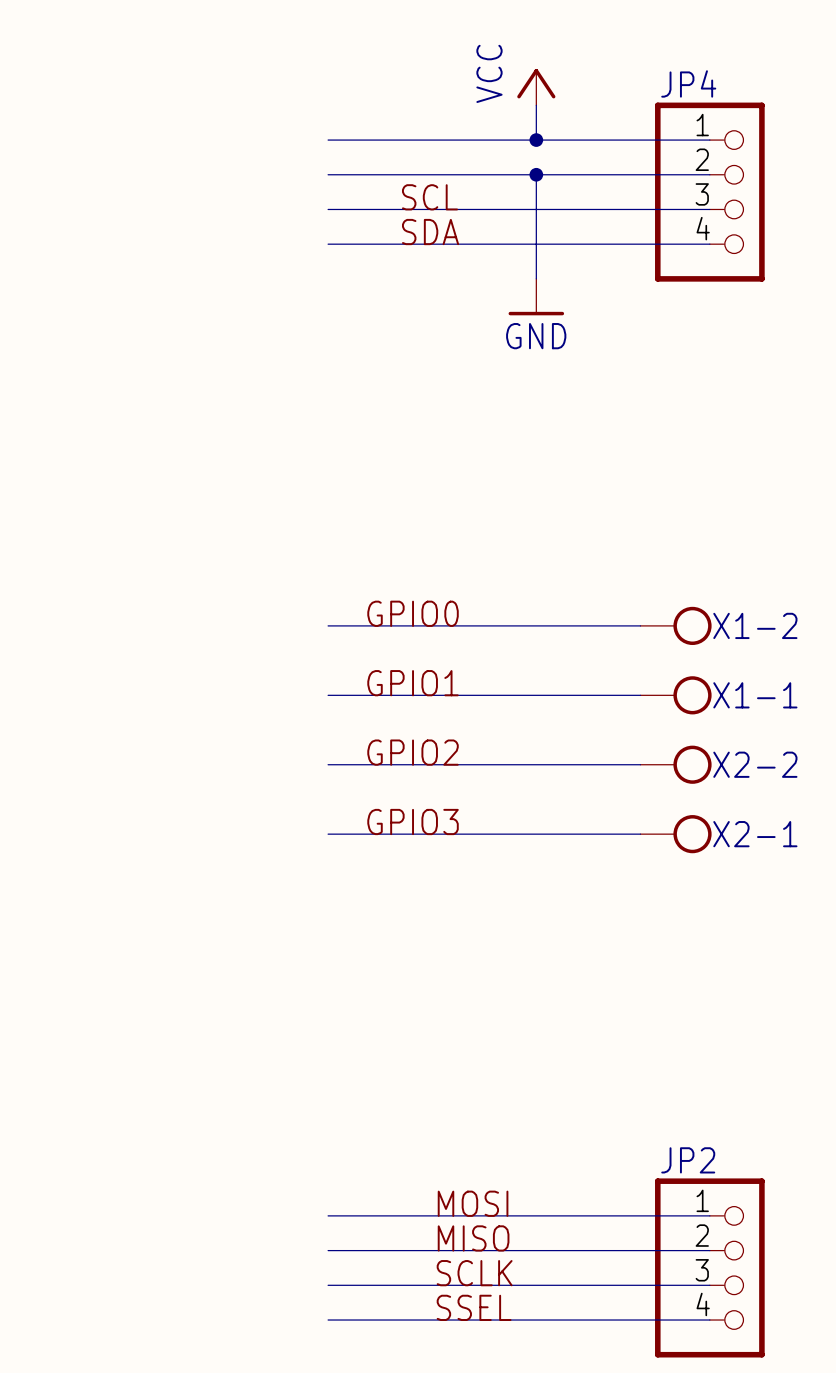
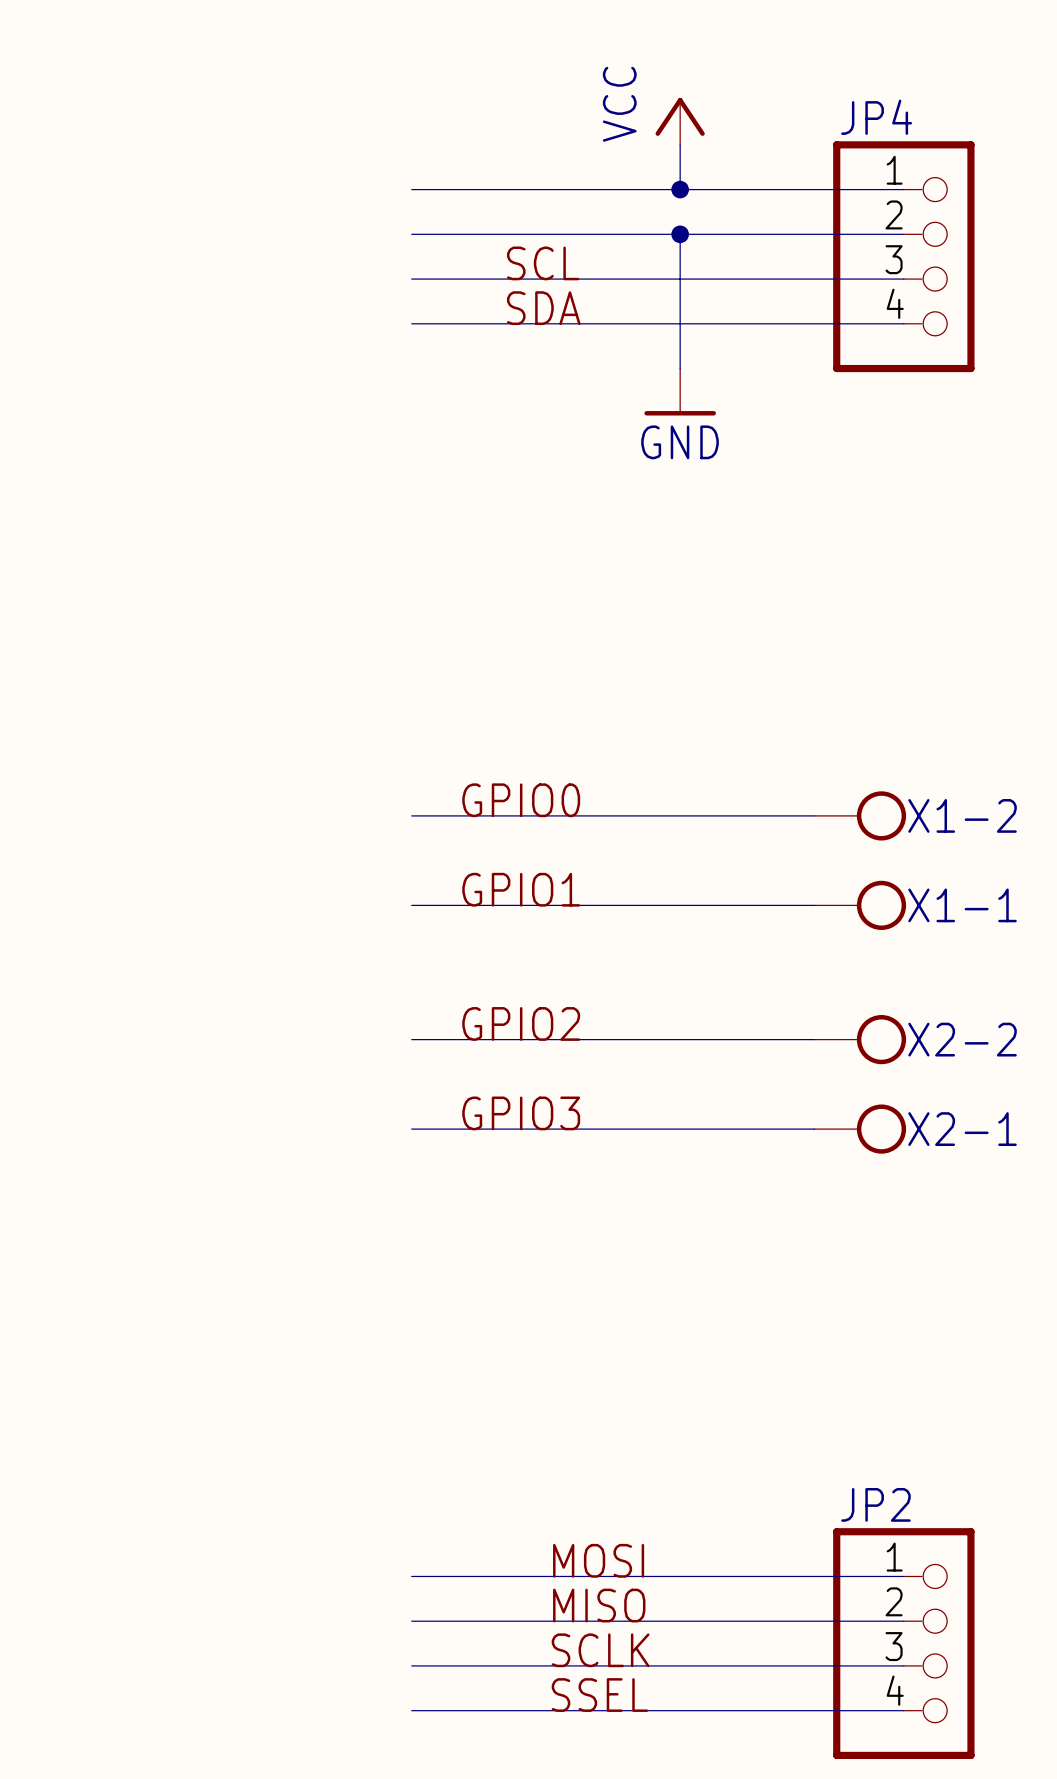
label position: GPIO2 (413, 752) -> GPIO2 (521, 1023)
wire: (328, 764) (640, 764) -> (411, 1039) (814, 1039)
X2-2 position: (676, 764) -> (860, 1039)
label position: GPIO3 (413, 822) -> GPIO3 (521, 1113)
wire: (328, 834) (640, 834) -> (411, 1129) (814, 1129)
X2-1 position: (676, 834) -> (860, 1129)

